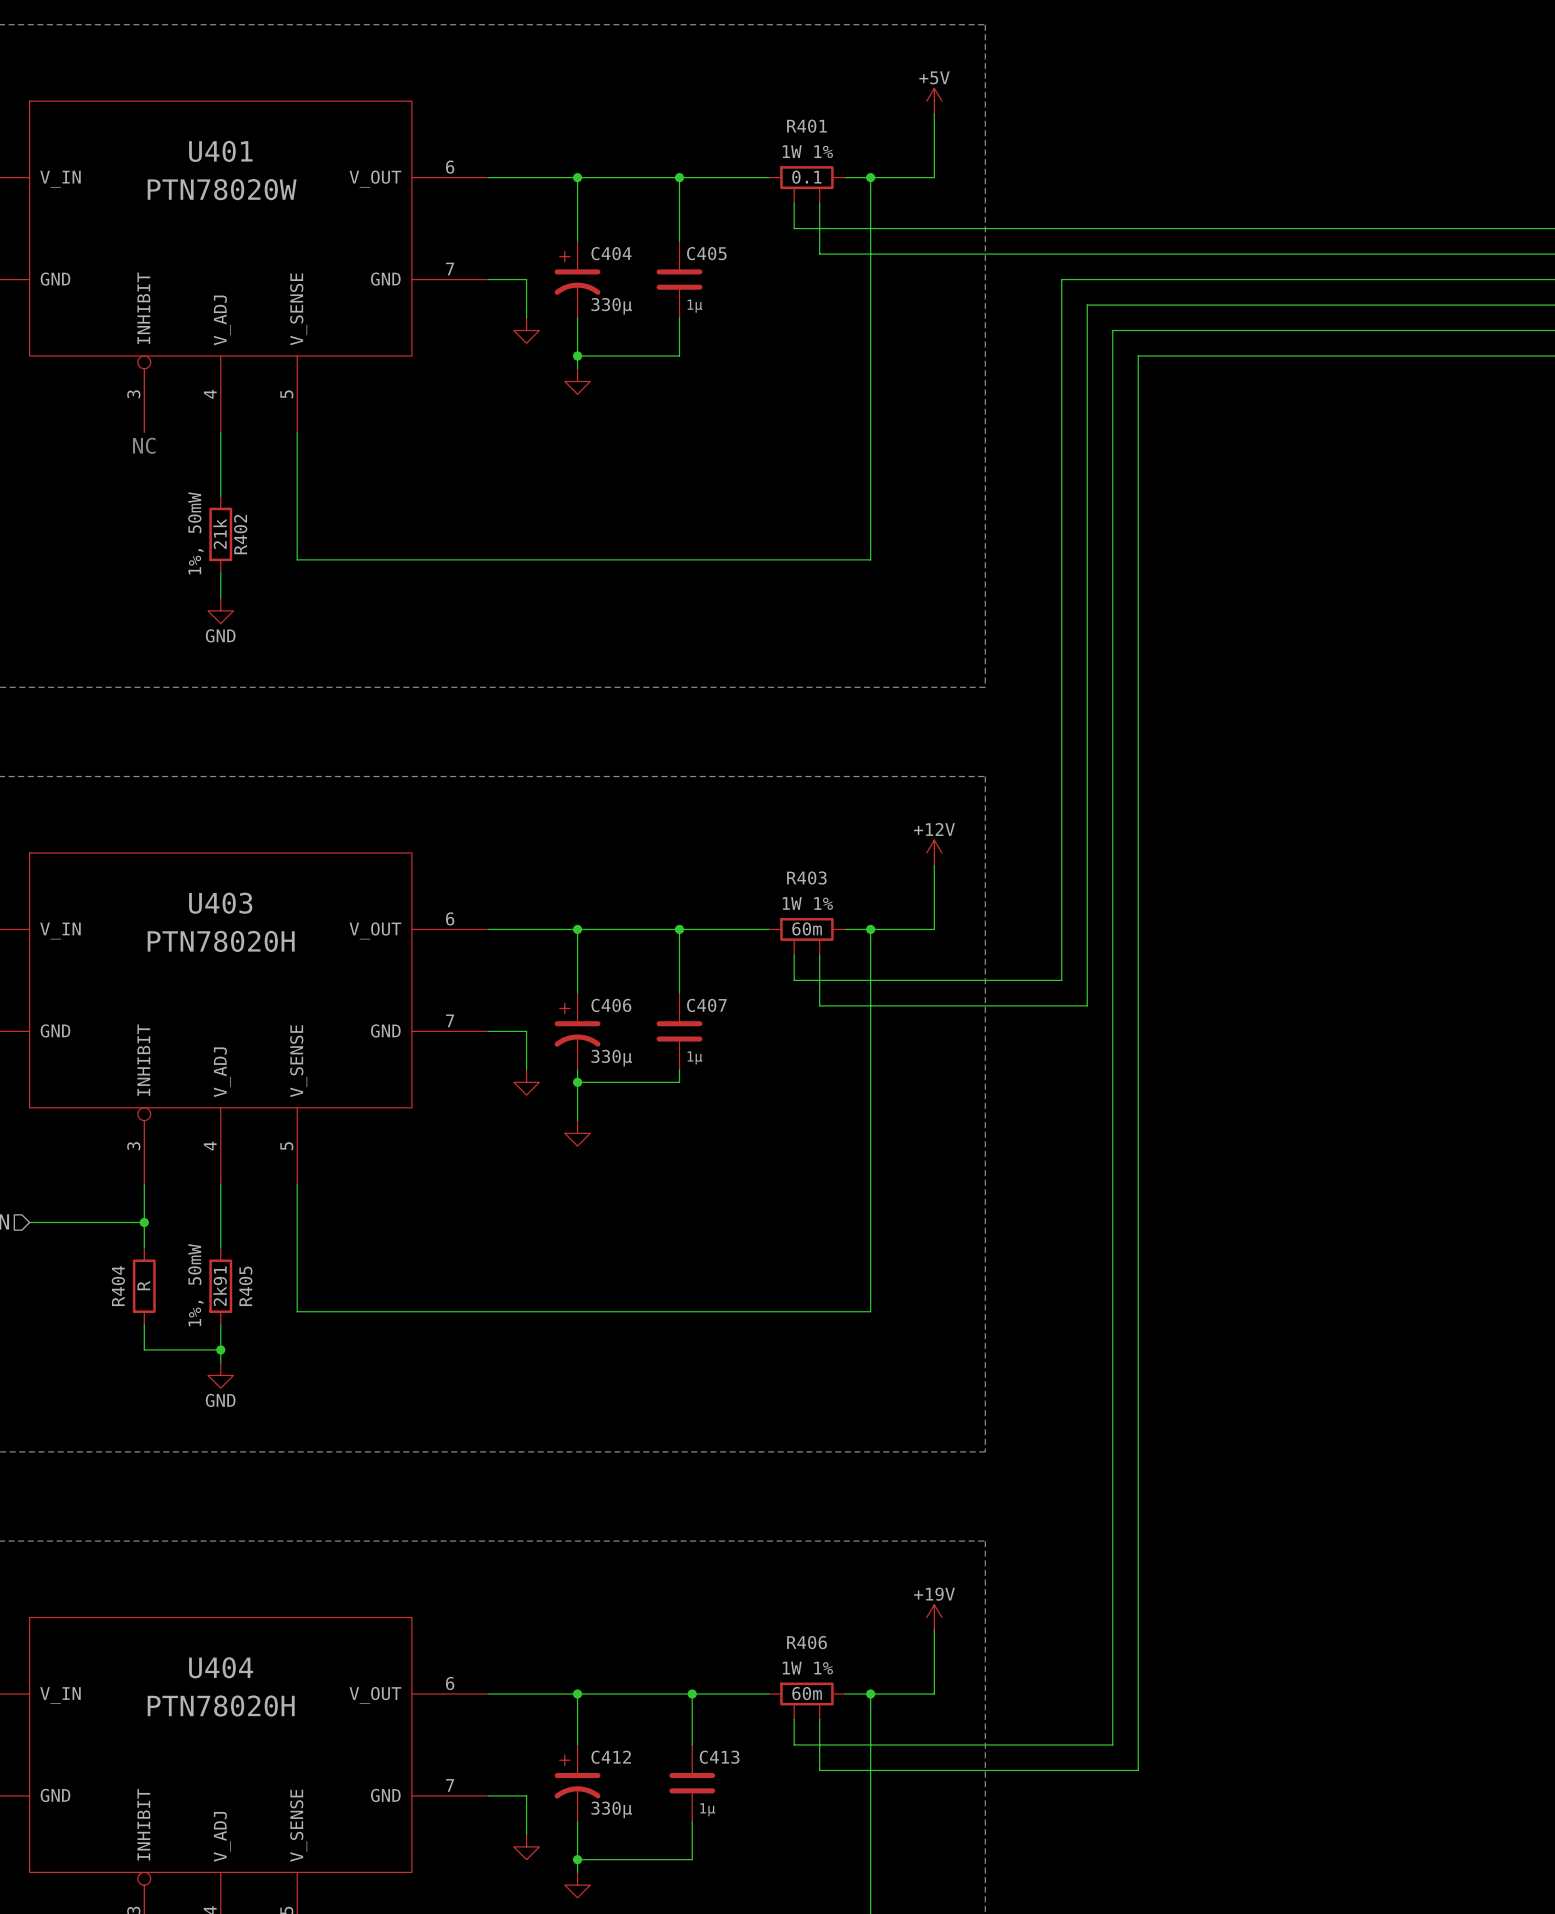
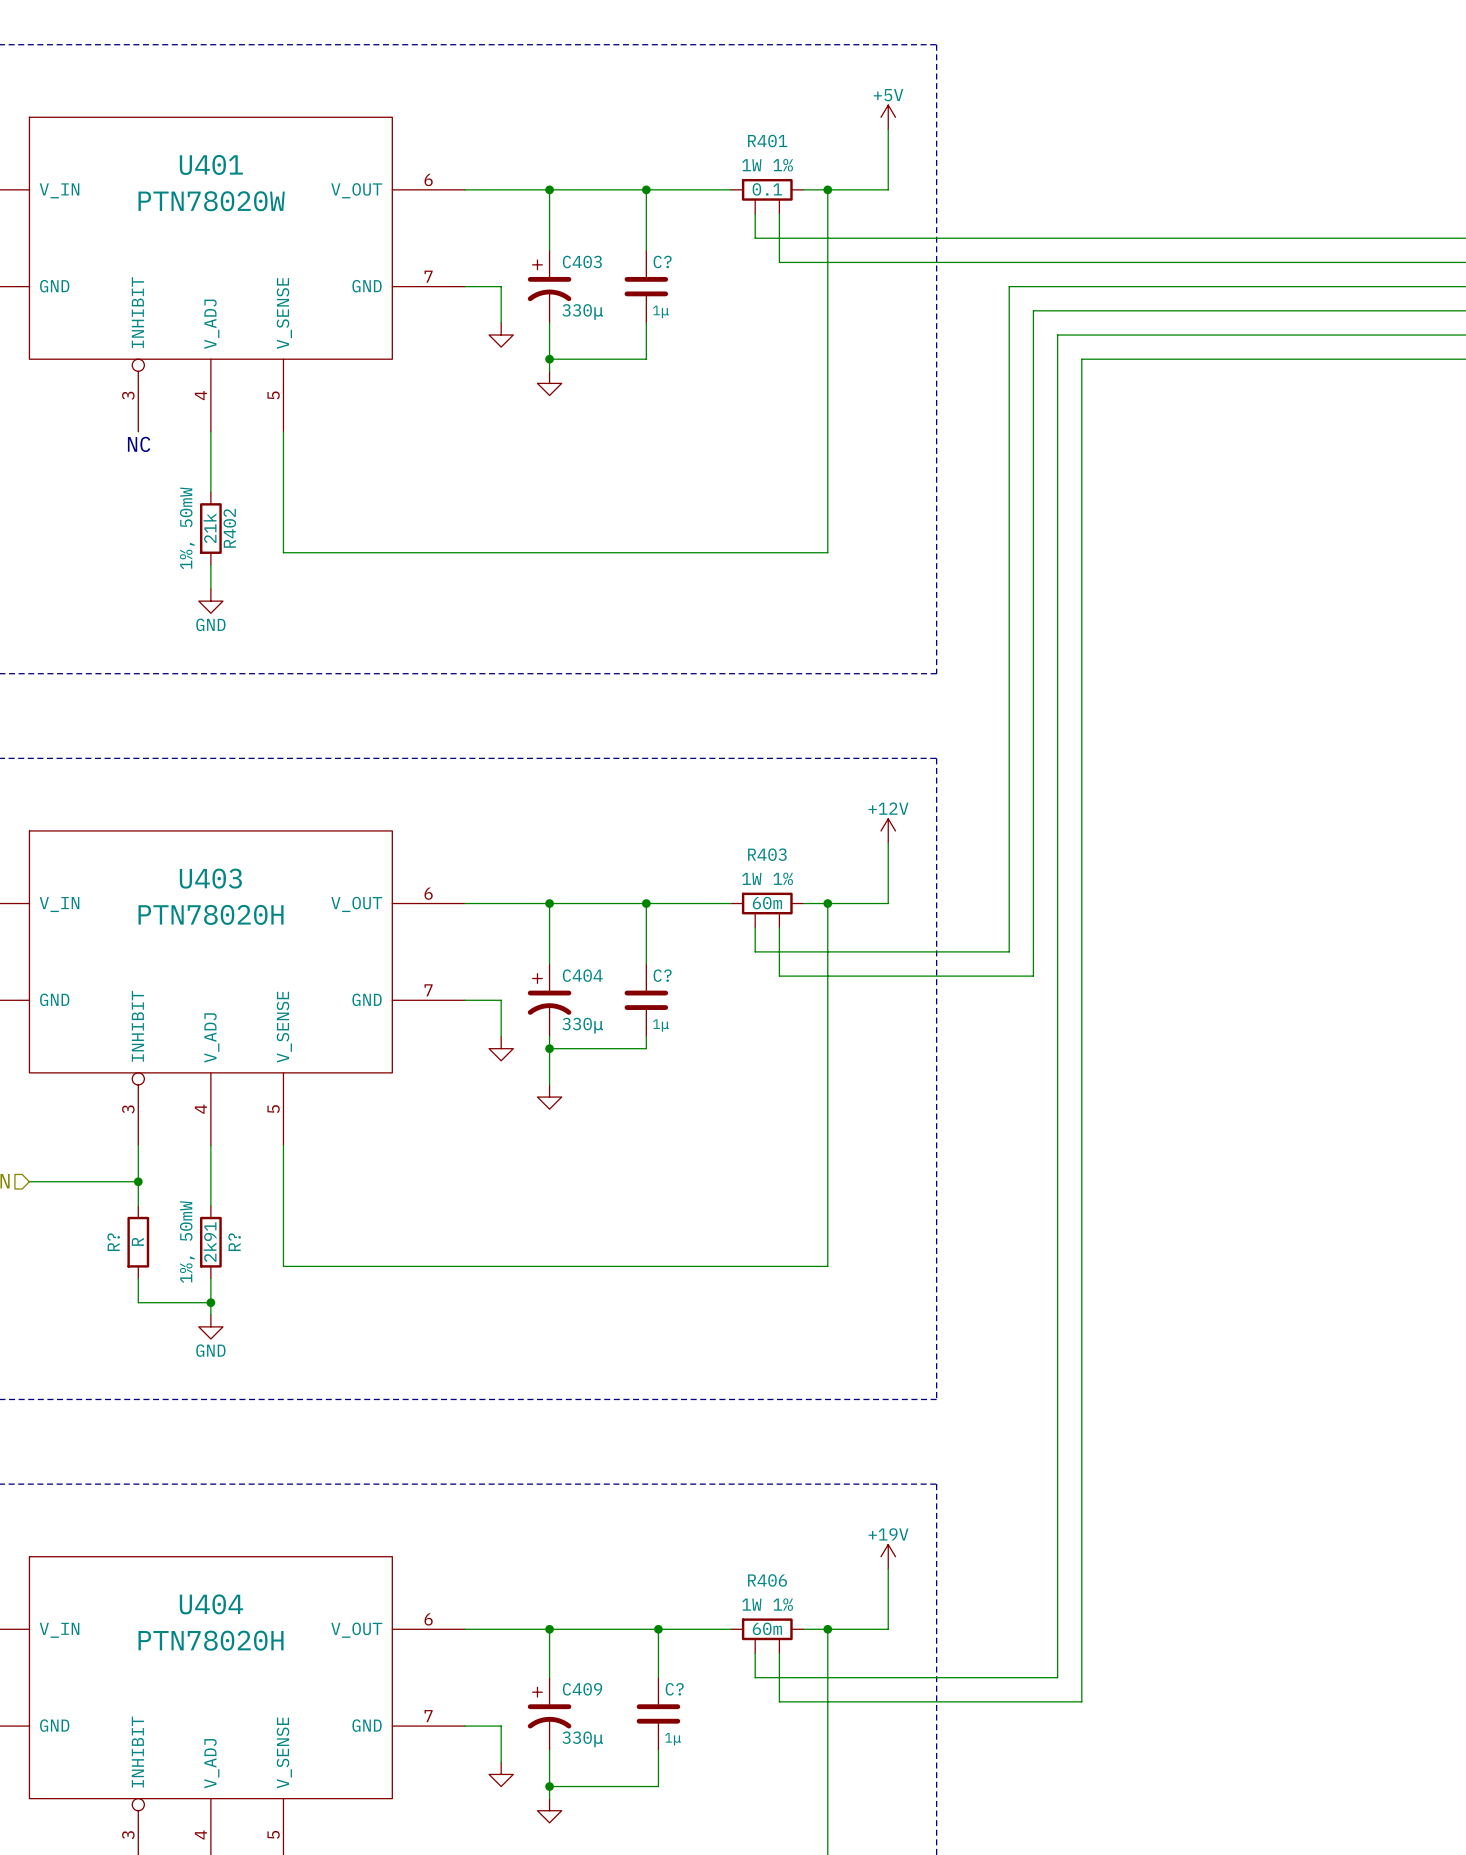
C404 name: C404 (611, 253) -> C403 (582, 261)
C405 name: C405 (706, 253) -> C? (662, 261)
C406 name: C406 (611, 1005) -> C404 (582, 975)
C407 name: C407 (706, 1005) -> C? (662, 975)
R404 name: R404 (118, 1286) -> R? (113, 1242)
R405 name: R405 (245, 1286) -> R? (234, 1242)
C412 name: C412 (611, 1757) -> C409 (582, 1689)
C413 name: C413 (719, 1757) -> C? (674, 1689)

